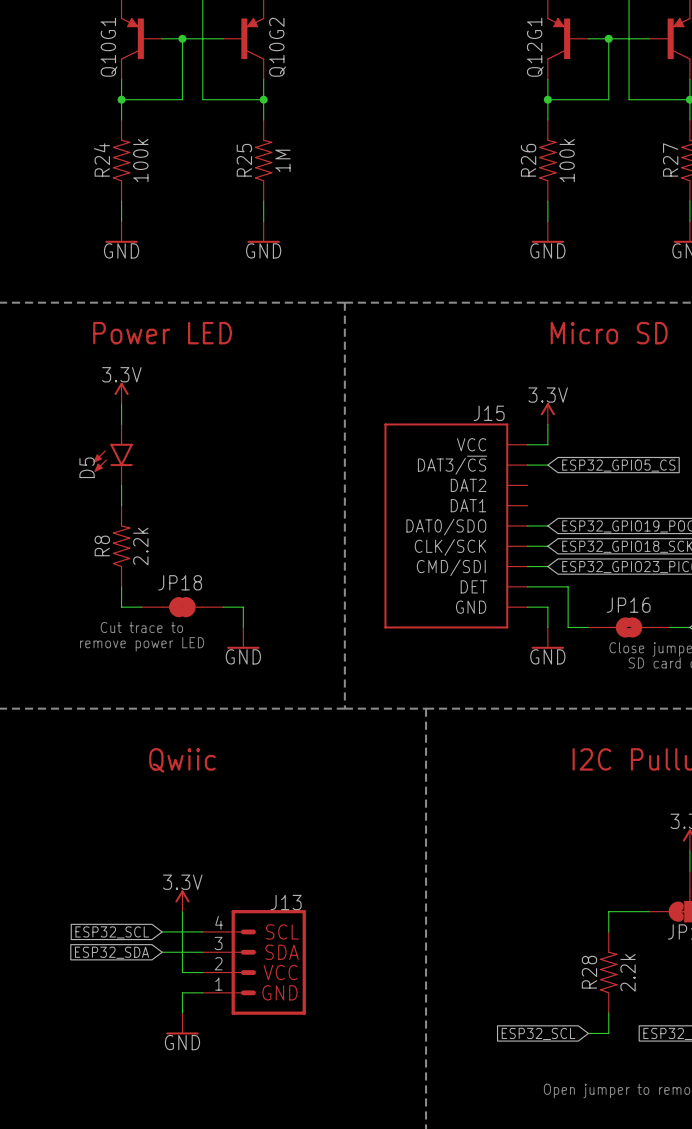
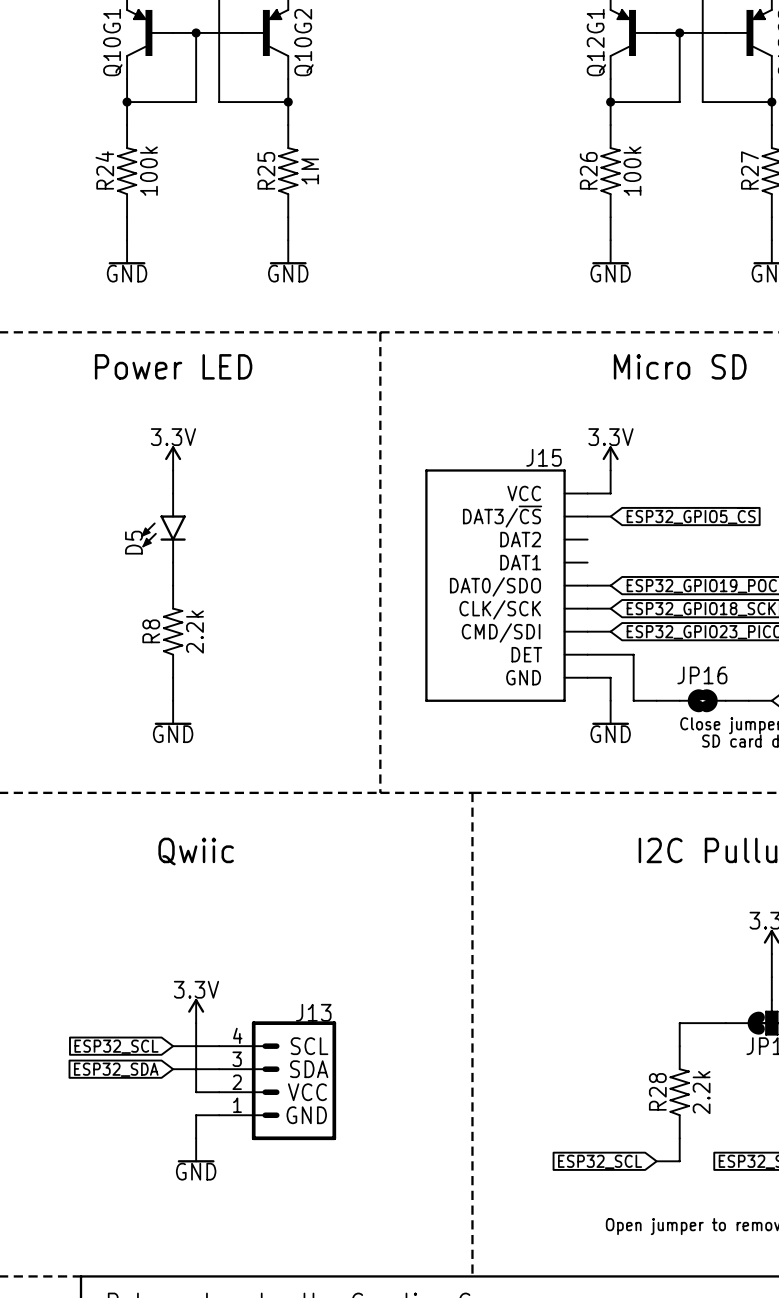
power symbol position: 3.3V (121, 393) -> 3.3V (173, 458)
wire: (121, 404) (121, 424) -> (173, 470) (173, 493)
D5 position: (113, 454) -> (163, 528)
wire: (121, 485) (121, 505) -> (173, 562) (173, 585)
R8 position: (121, 546) -> (173, 631)
wire: (121, 586) (121, 607) (141, 607) -> none
wire: none -> (173, 677) (173, 700)
JP18: (182, 607) -> none
wire: (223, 607) (243, 607) (243, 627) -> none
text: Cut trace to (141, 627) -> none
power symbol position: GND (243, 638) -> GND (173, 712)
text: remove power LED (142, 644) -> none

